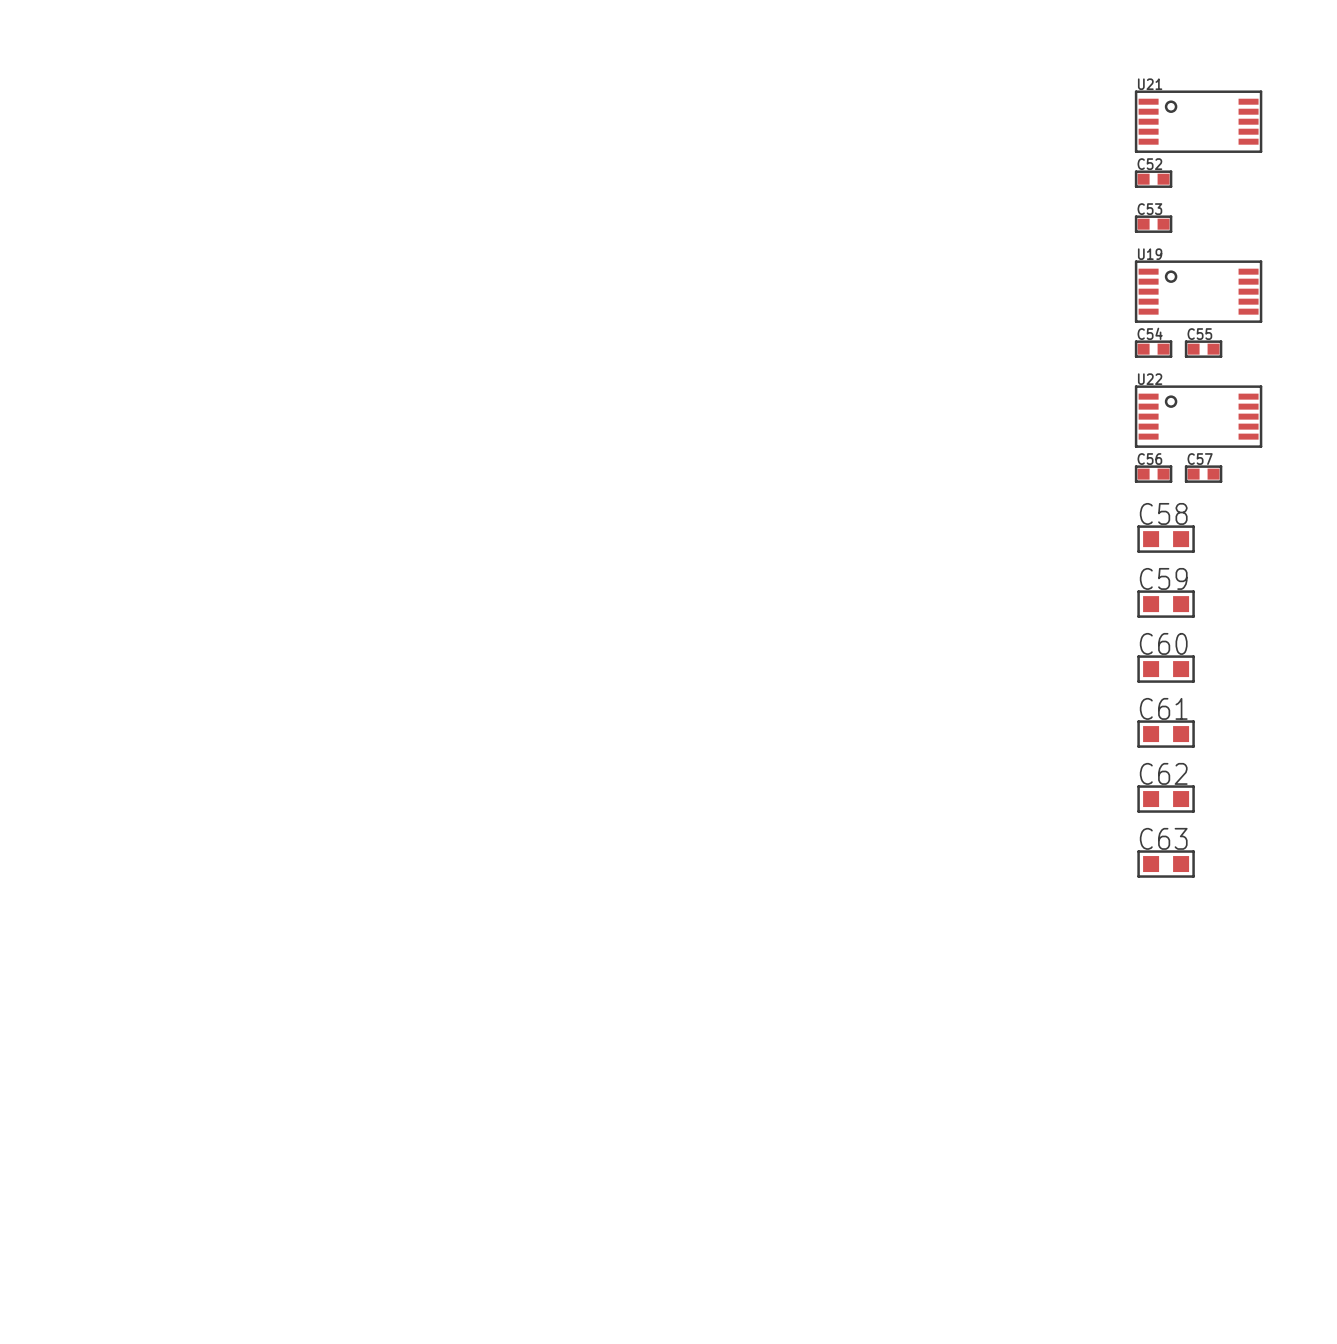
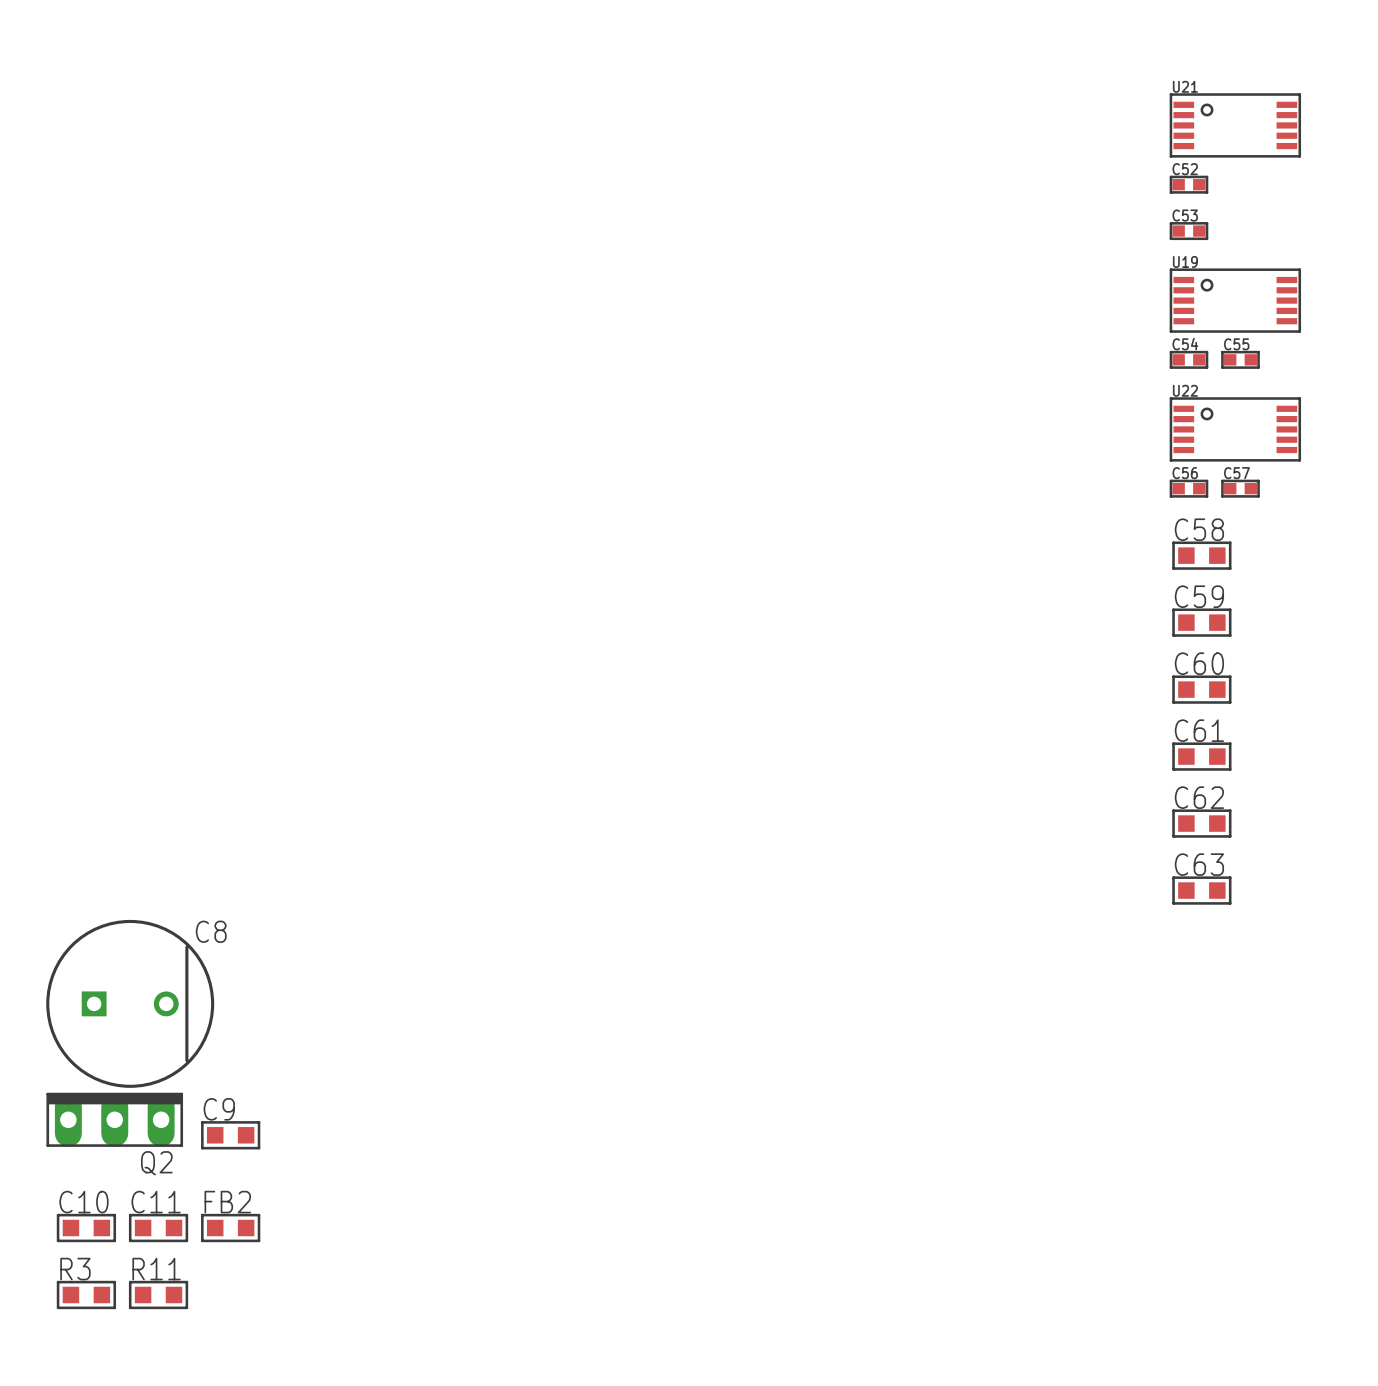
C8: none -> (130, 1003)
Q2: none -> (114, 1119)
C9: none -> (230, 1135)
C10: none -> (86, 1228)
C11: none -> (158, 1228)
FB2: none -> (230, 1228)
R3: none -> (86, 1294)
R11: none -> (158, 1294)

